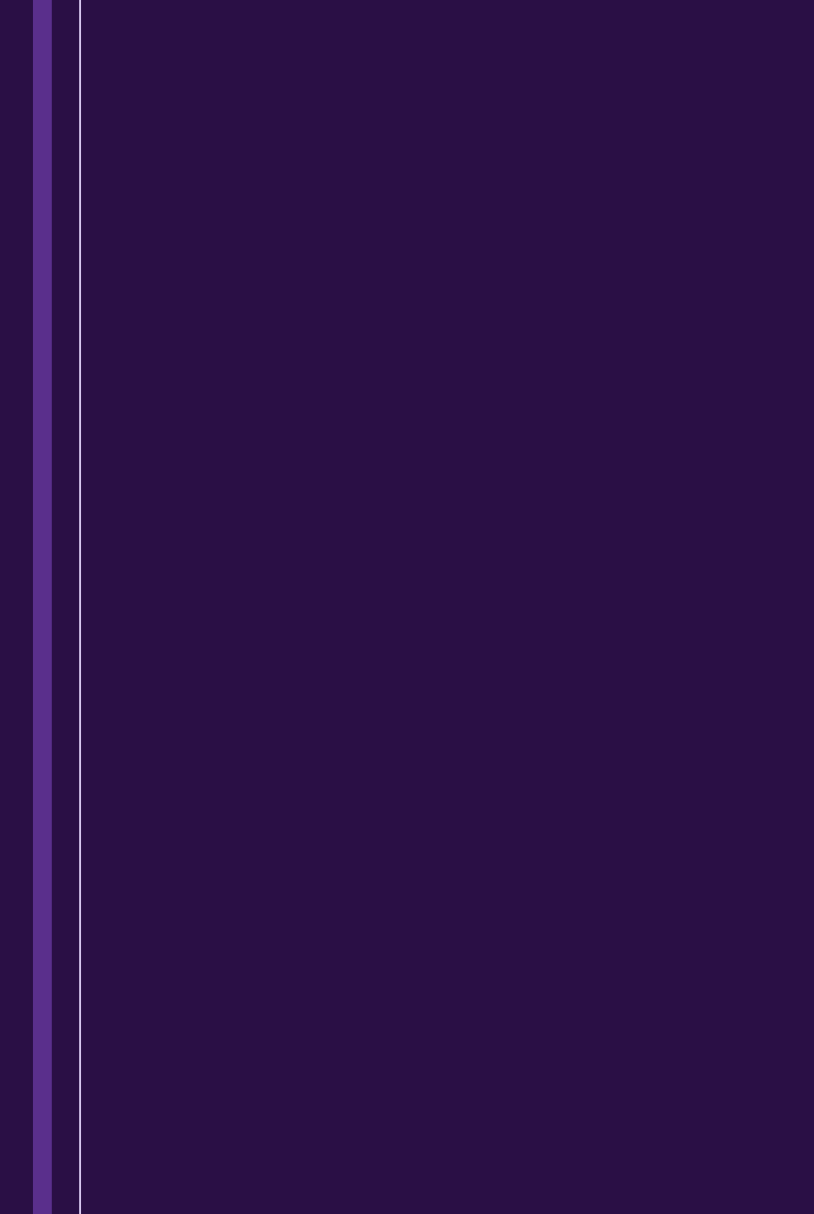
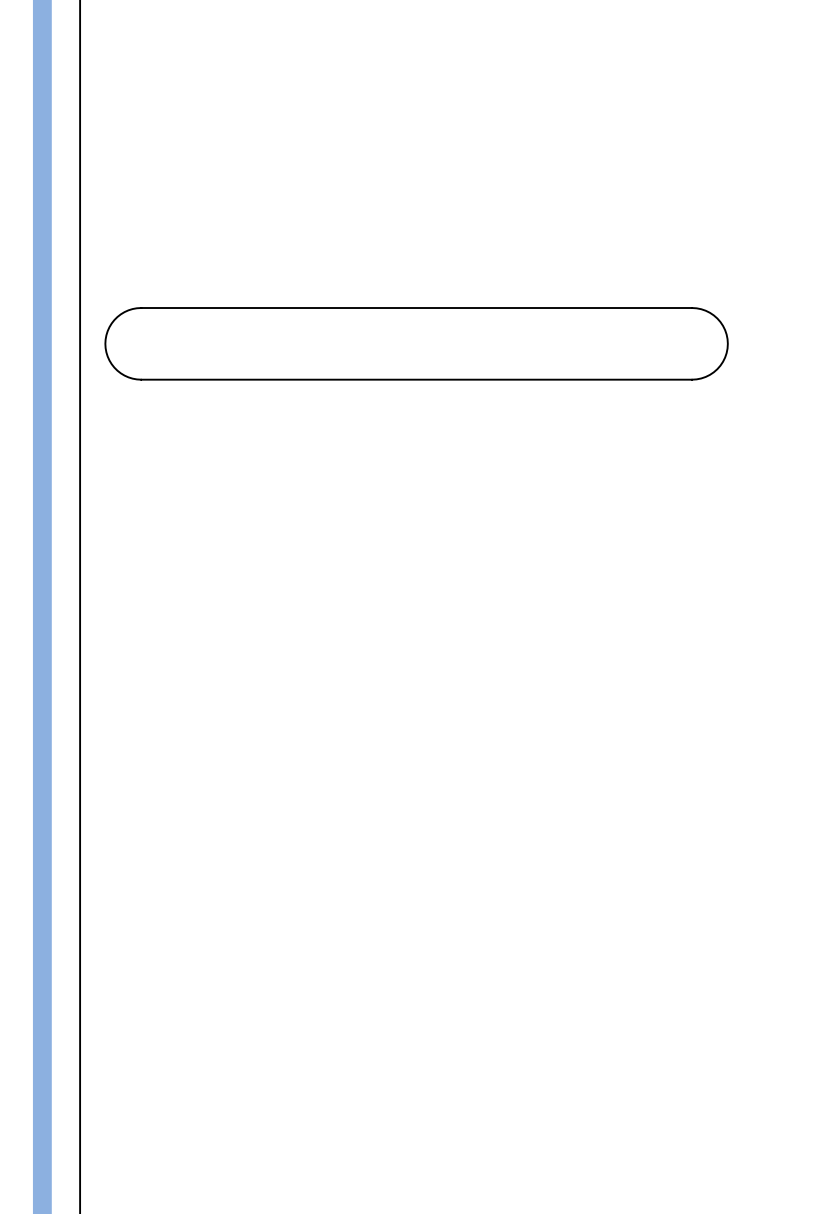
part: none -> (416, 343)

